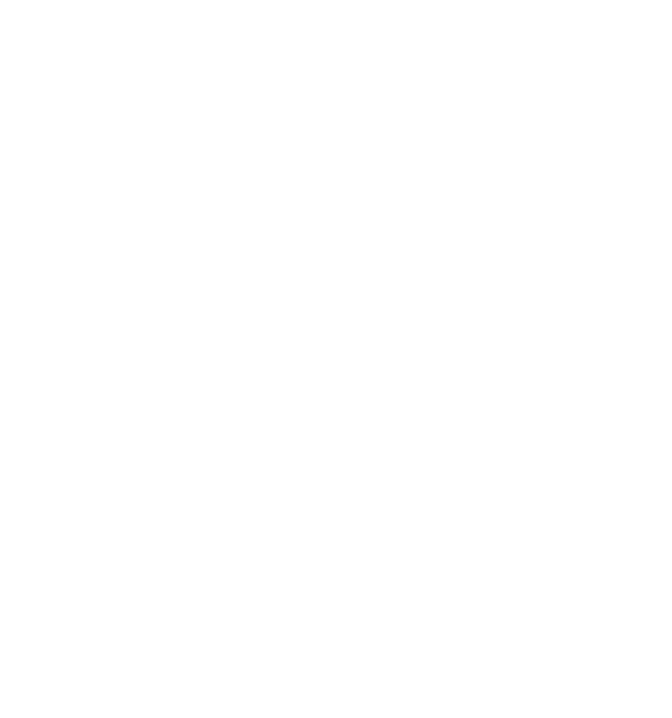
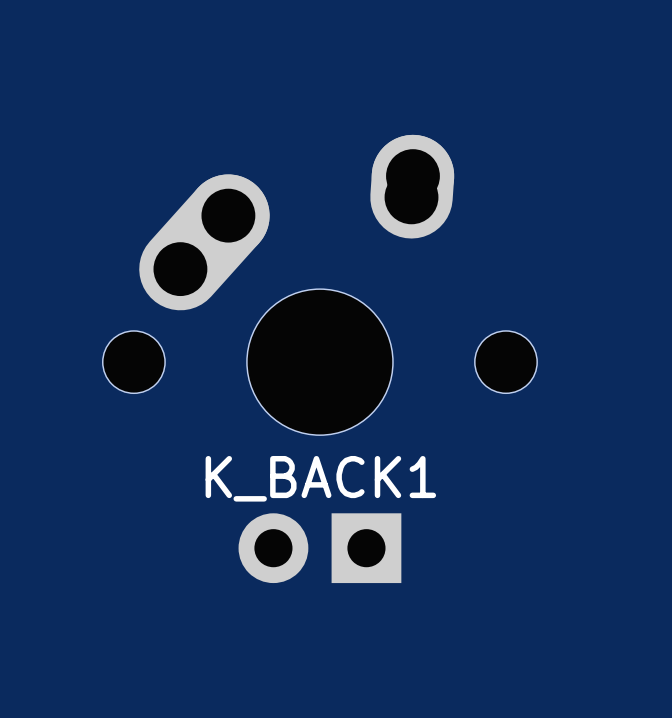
K_BACK1: none -> (319, 358)

